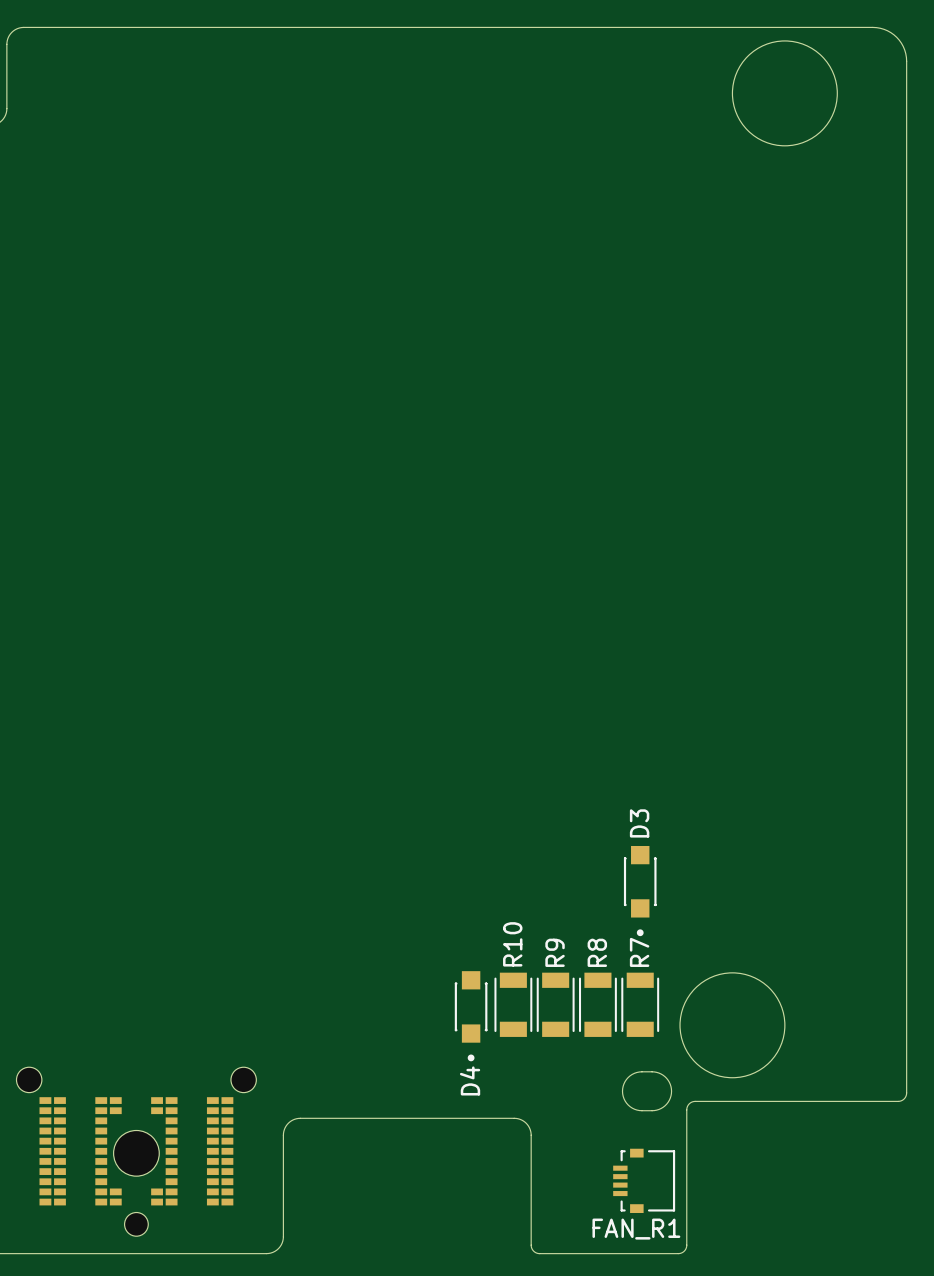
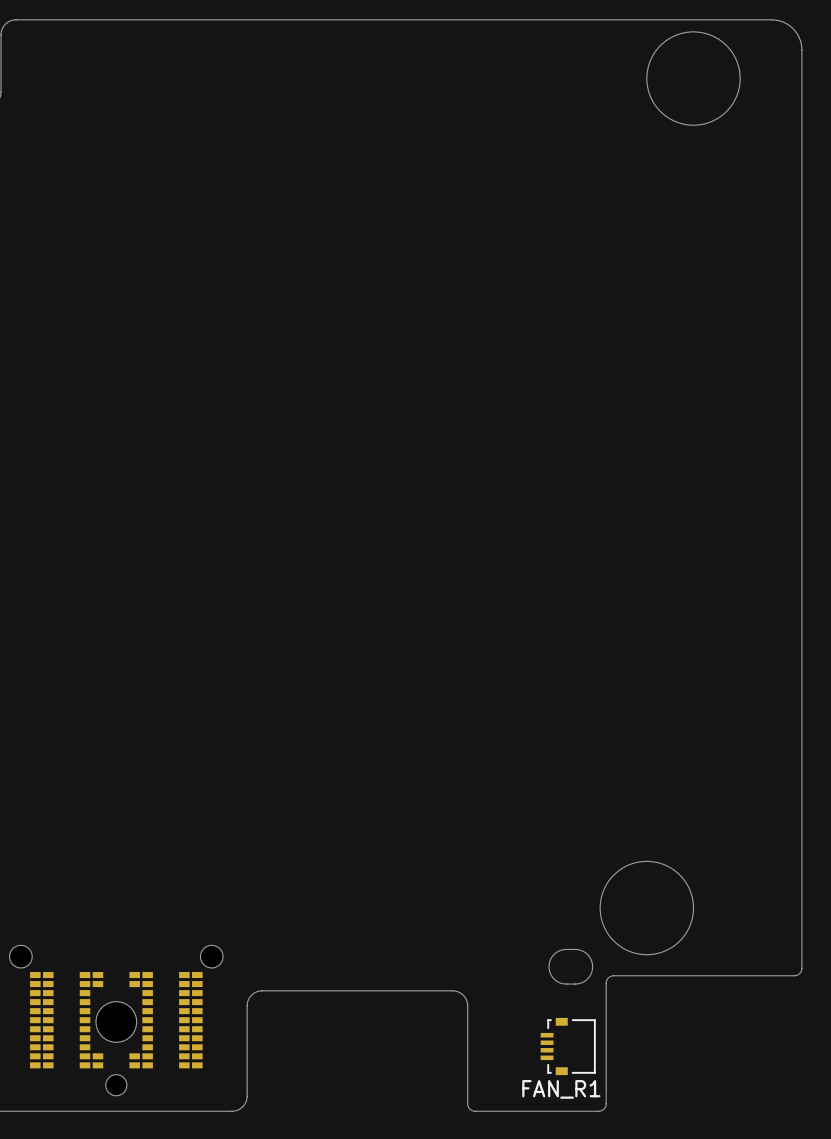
D3: (640, 891) -> none
R10: (513, 1004) -> none
R9: (555, 1004) -> none
R8: (597, 1004) -> none
R7: (640, 1004) -> none
D4: (471, 1016) -> none

